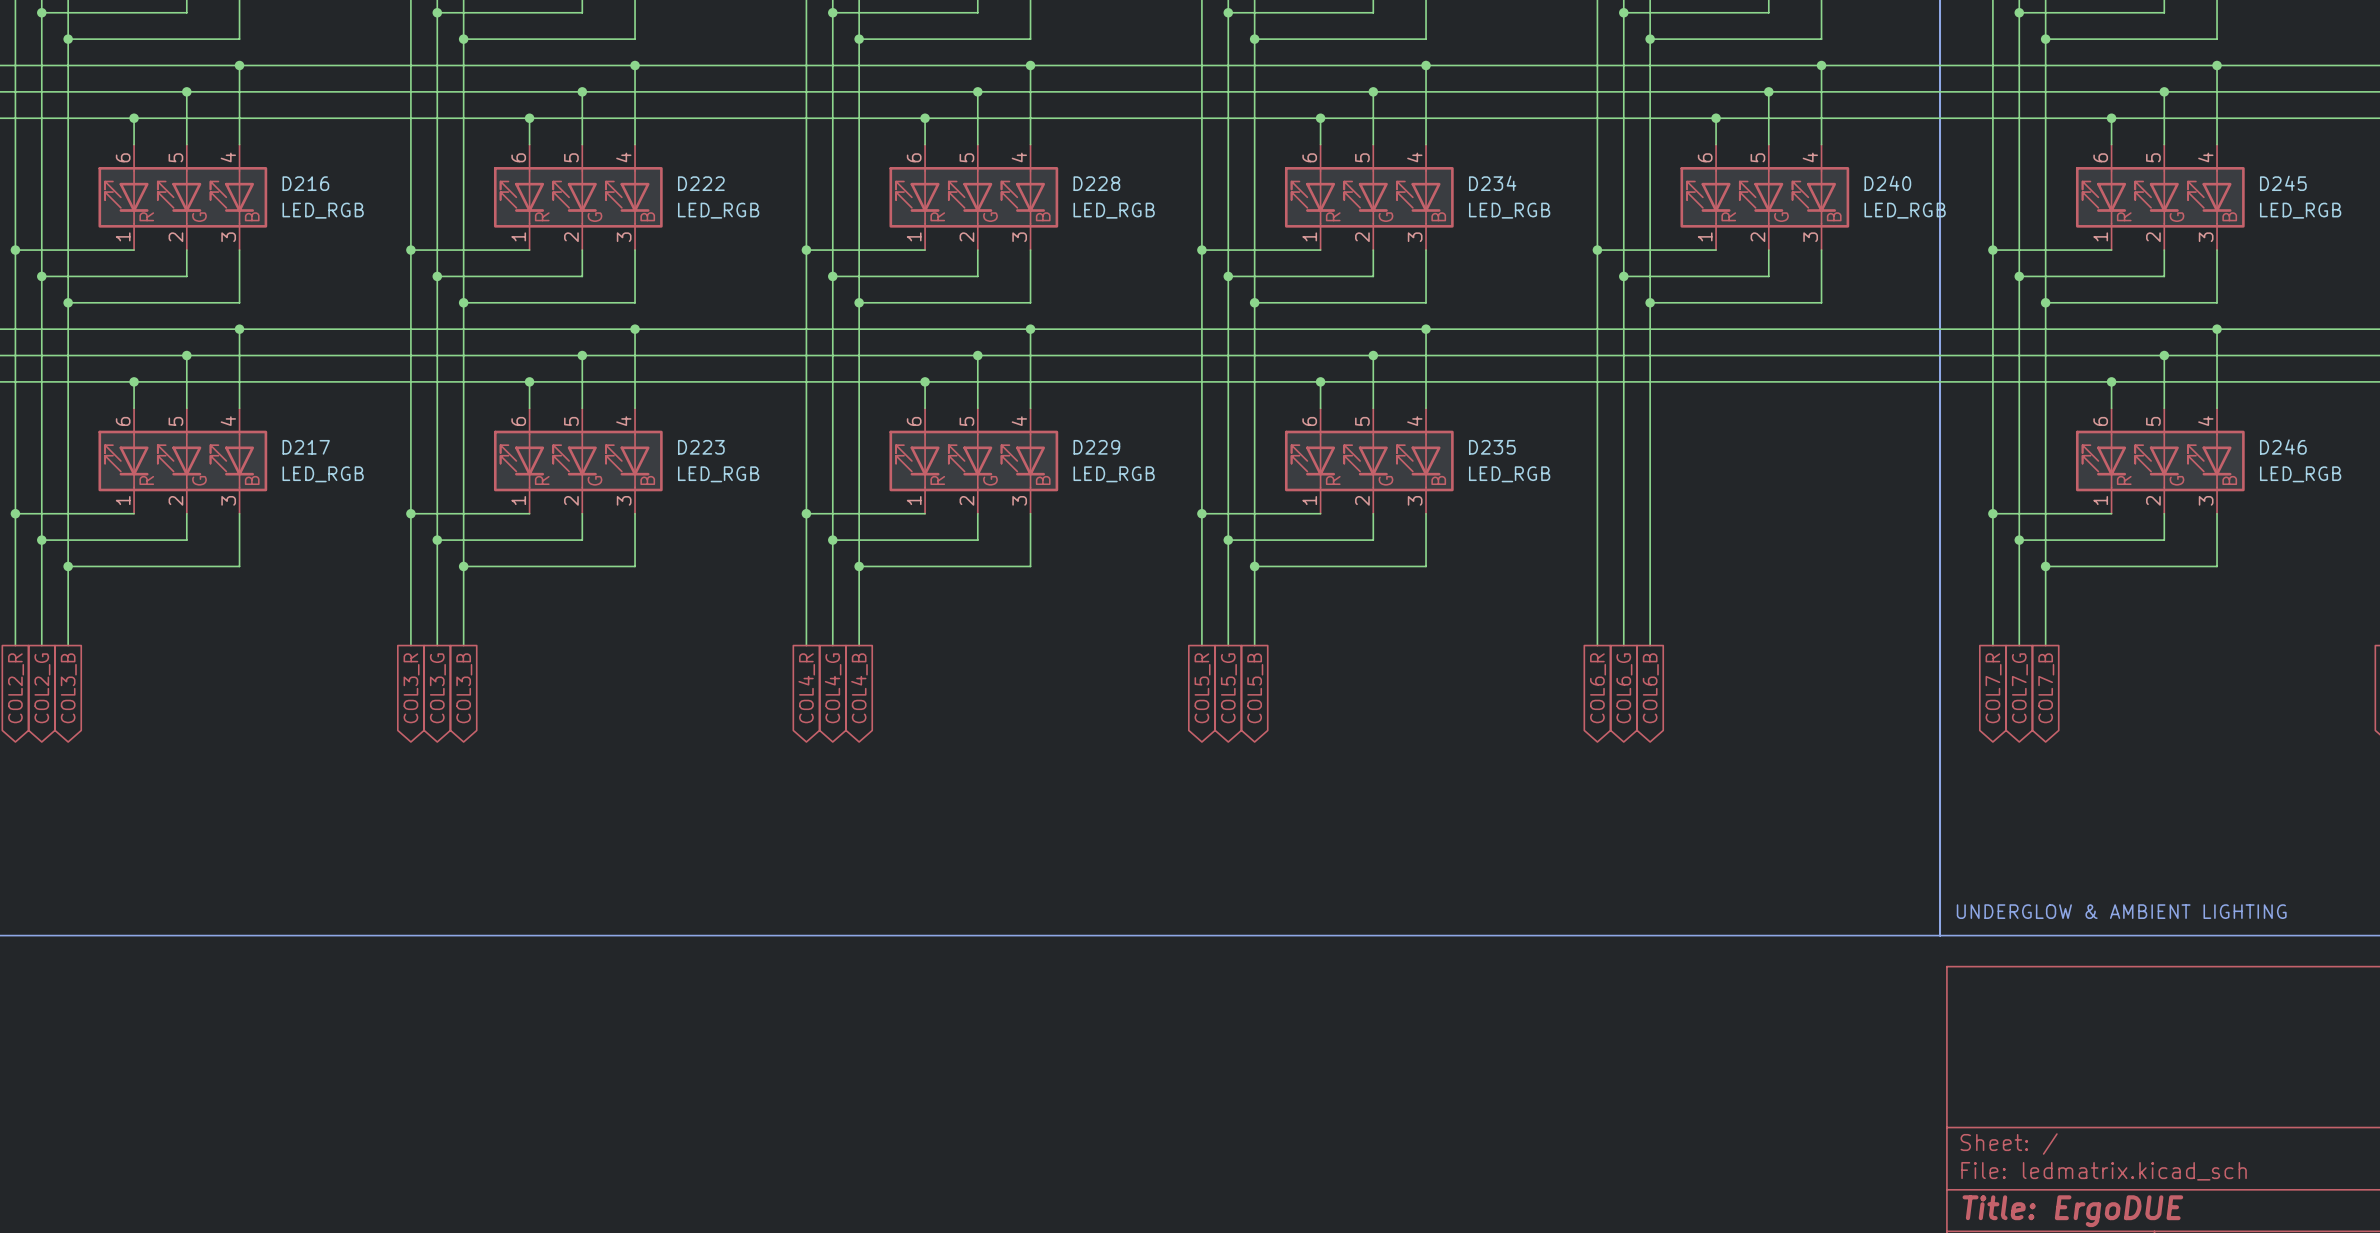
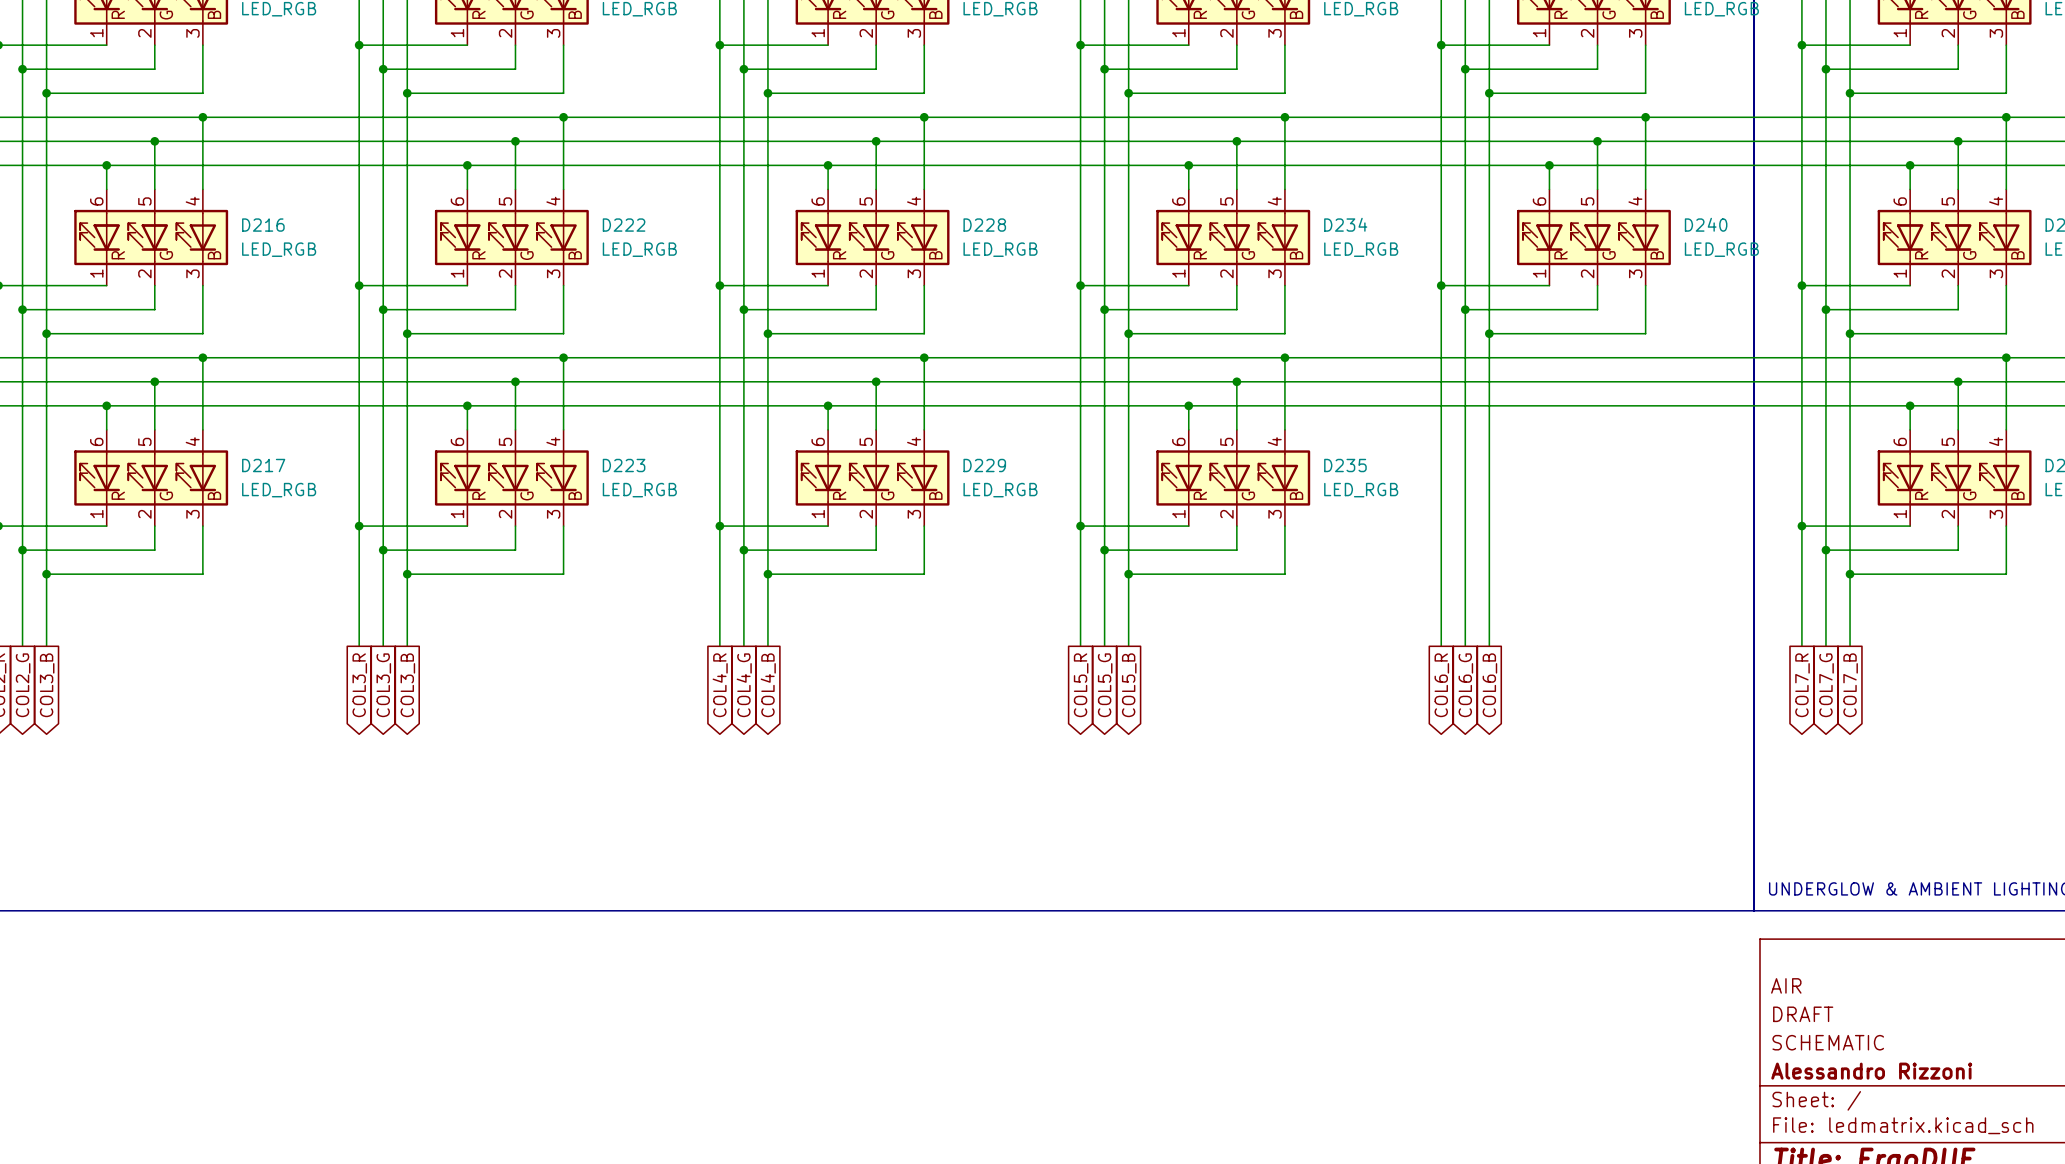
title block: none -> AIR (1786, 985)
title block: none -> DRAFT (1803, 1014)
title block: none -> SCHEMATIC (1828, 1042)
title block: none -> Alessandro Rizzoni (1871, 1071)

